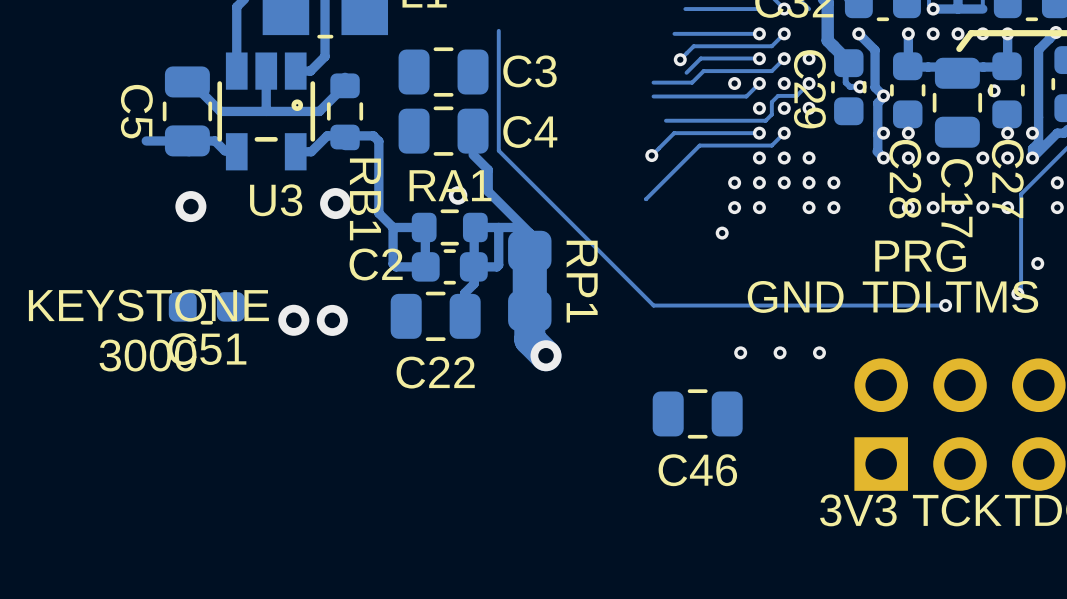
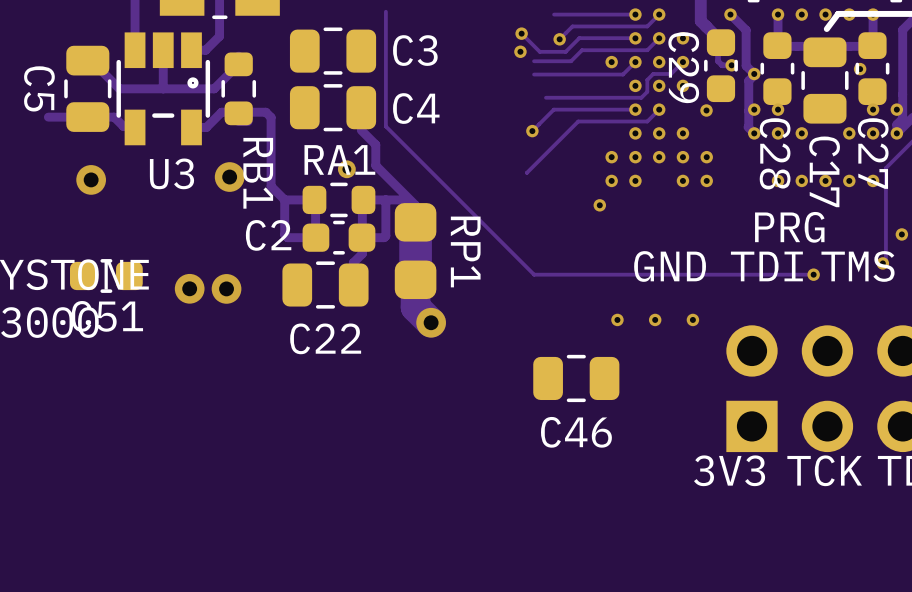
track: none -> (521, 33) (539, 51) (565, 51)
via: none -> (521, 33)
via: none -> (520, 51)
via: none -> (706, 110)

